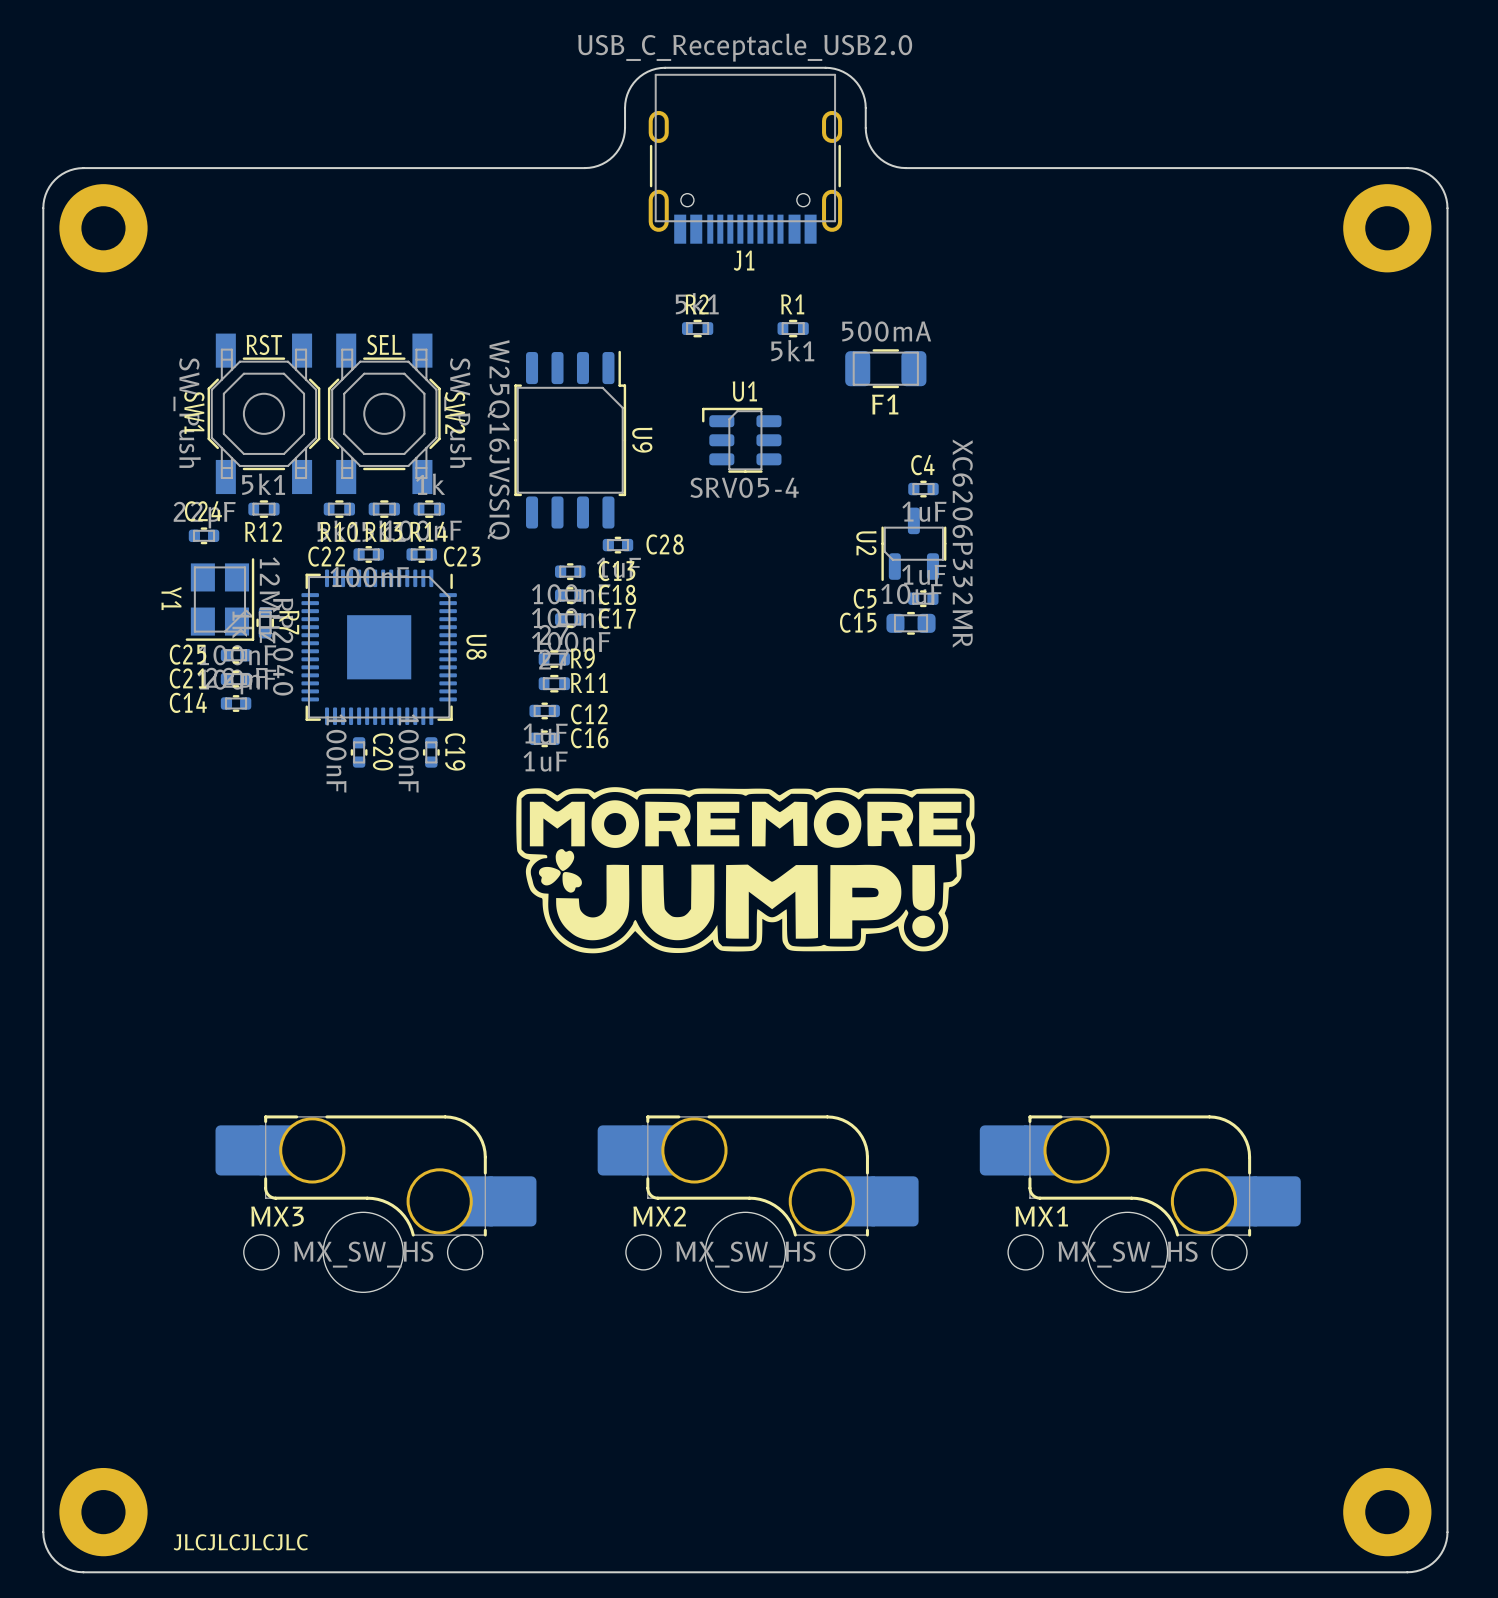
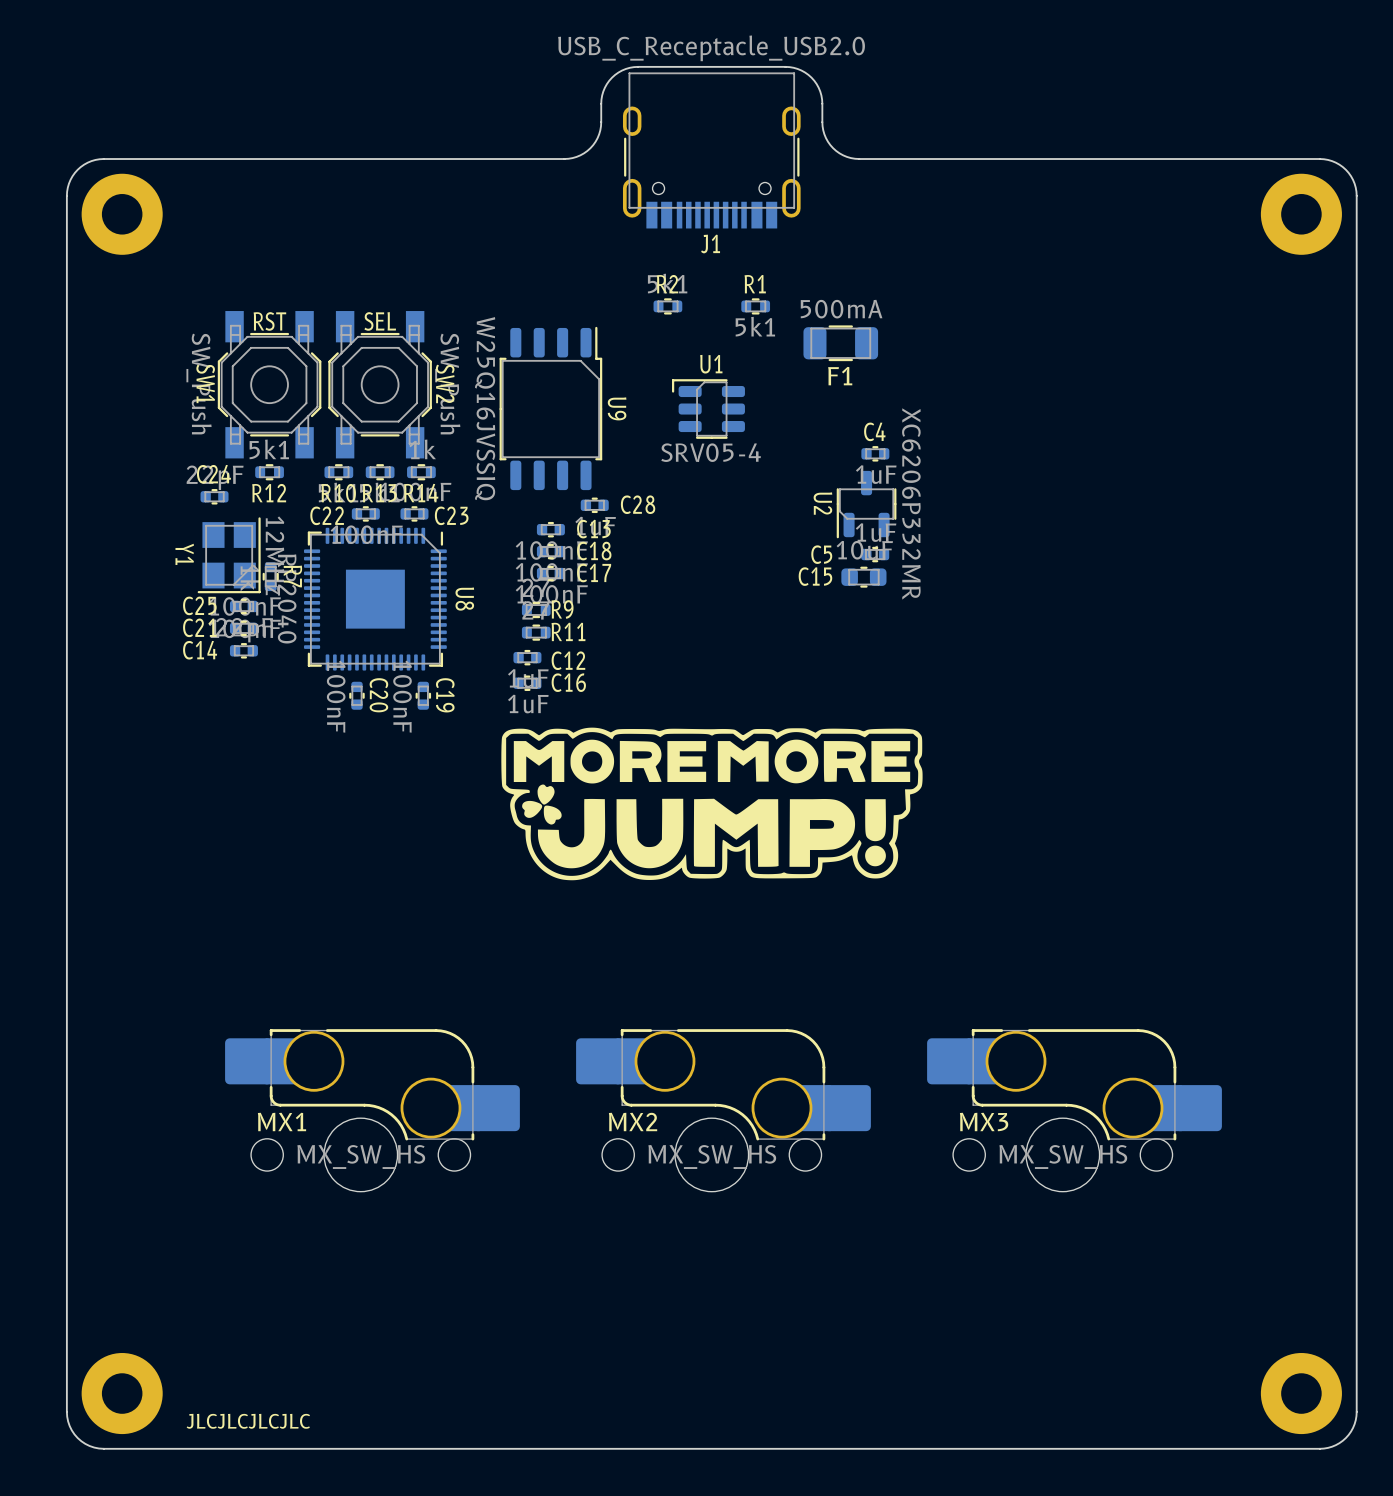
MX3 name: MX3 (277, 1216) -> MX1 (282, 1121)
MX1 name: MX1 (1041, 1216) -> MX3 (984, 1121)

